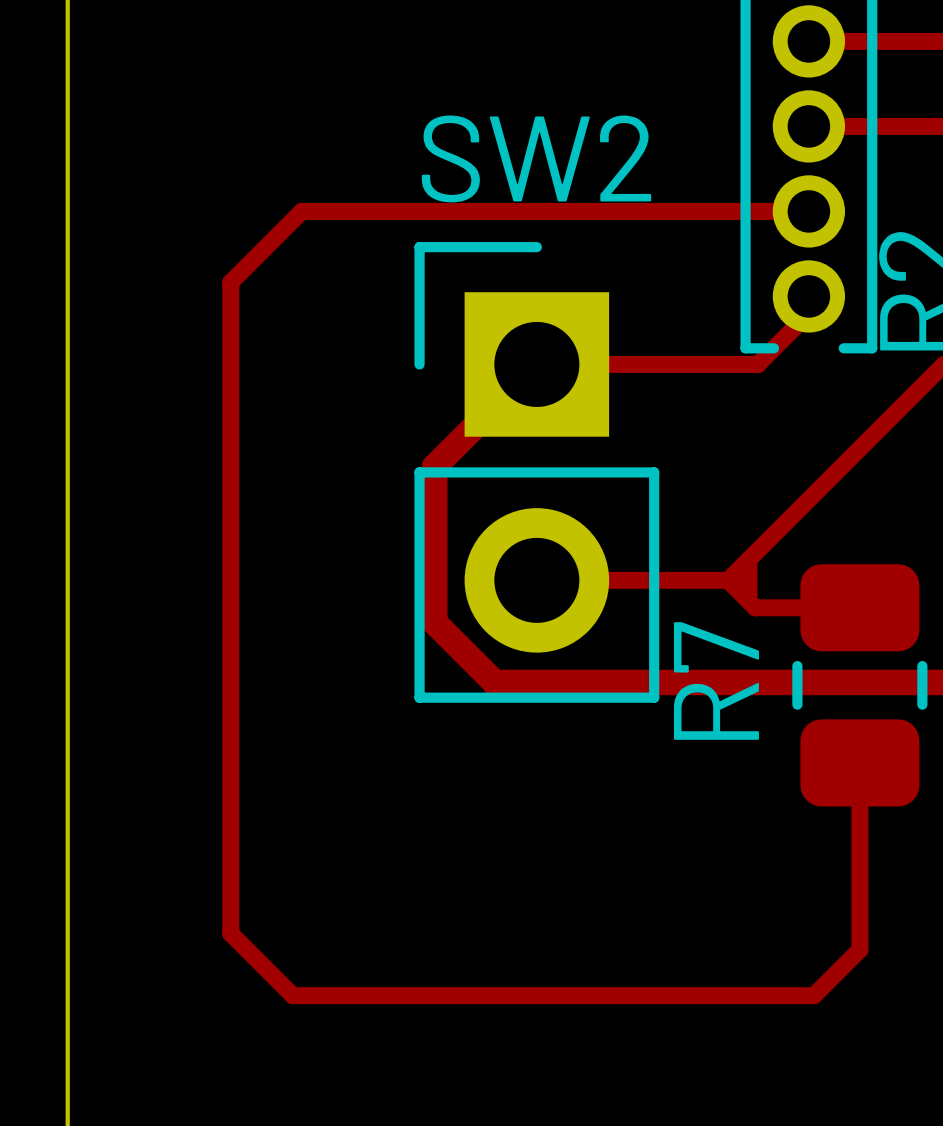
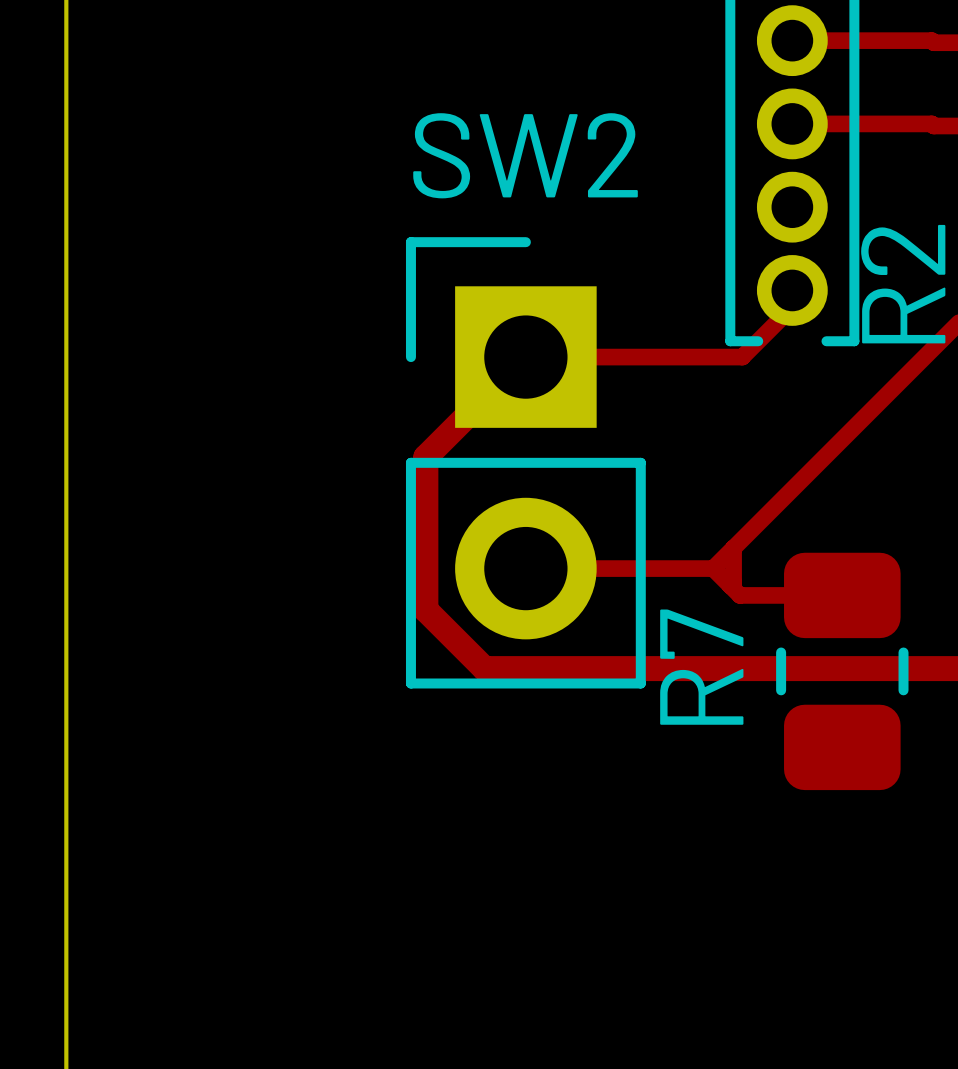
track: (808, 211) (301, 211) (230, 282) (230, 933) (292, 995) (813, 995) (859, 949) (859, 762) -> none

